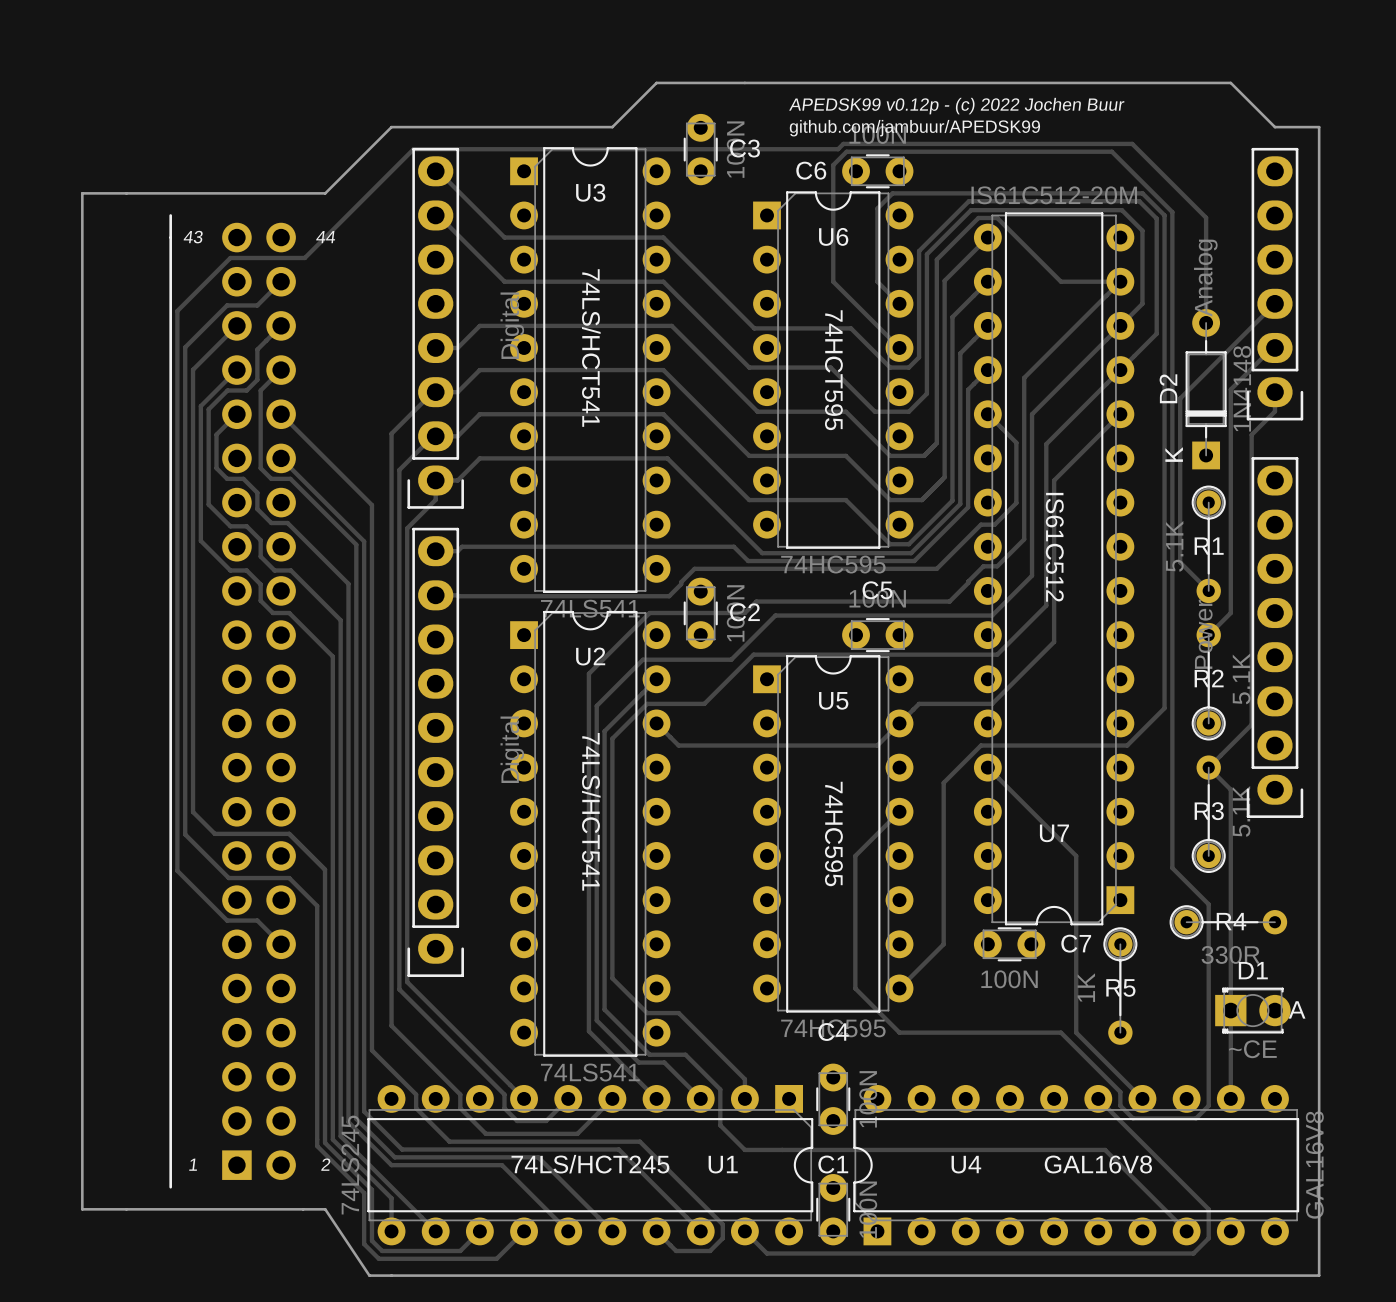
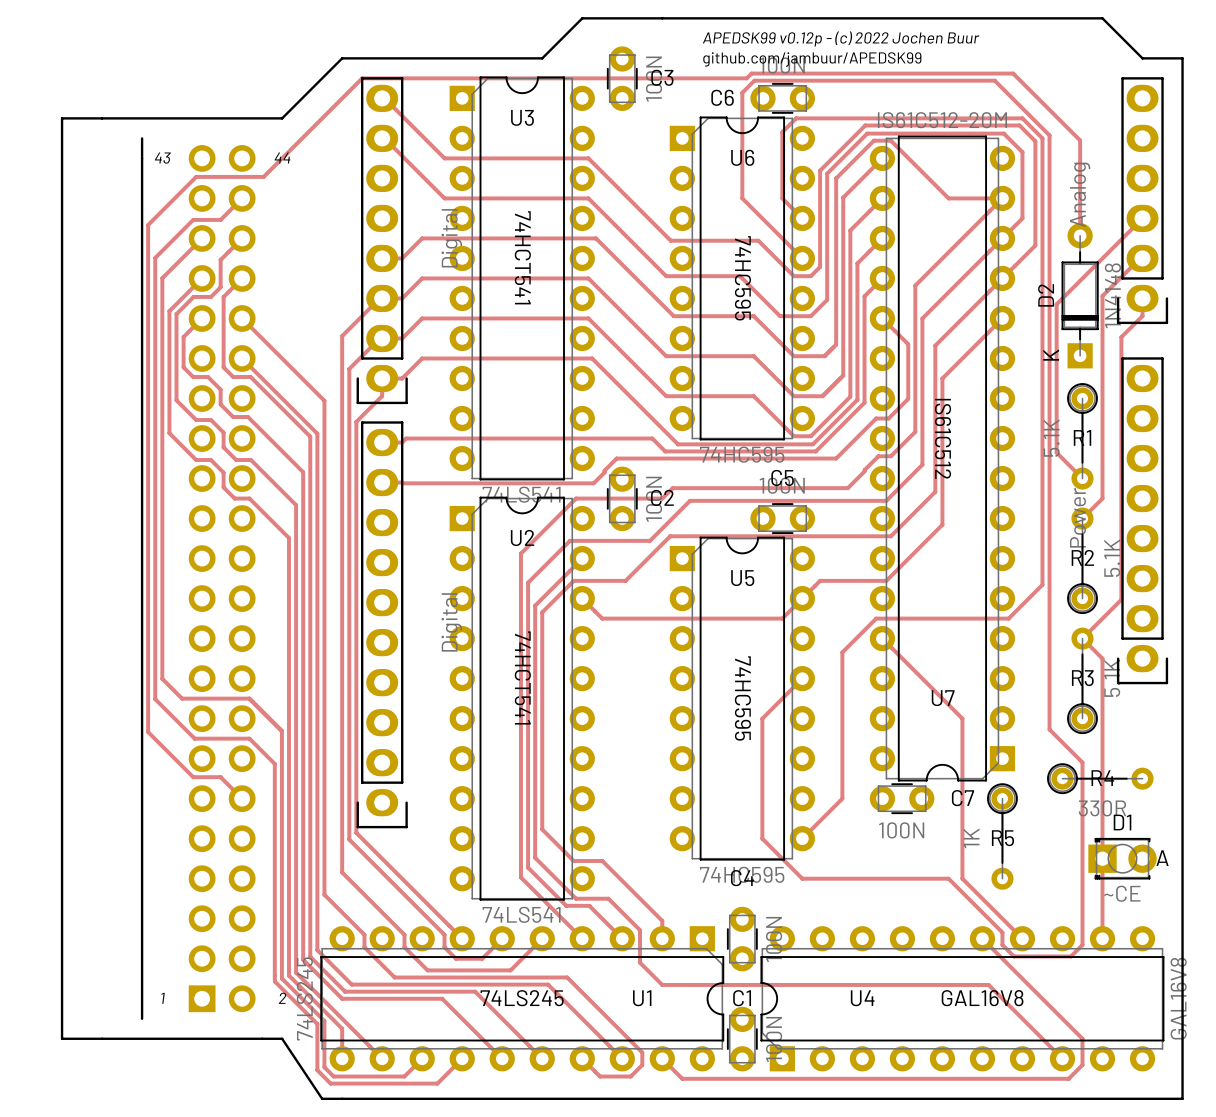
text: 74LS/HCT541 (591, 348) -> 74HCT541 (522, 257)
text: 74HCT595 (833, 370) -> 74HC595 (742, 278)
text: 74LS/HCT541 (591, 811) -> 74HCT541 (522, 677)
text: 74LS/HCT245 (590, 1164) -> 74LS245 (522, 998)

